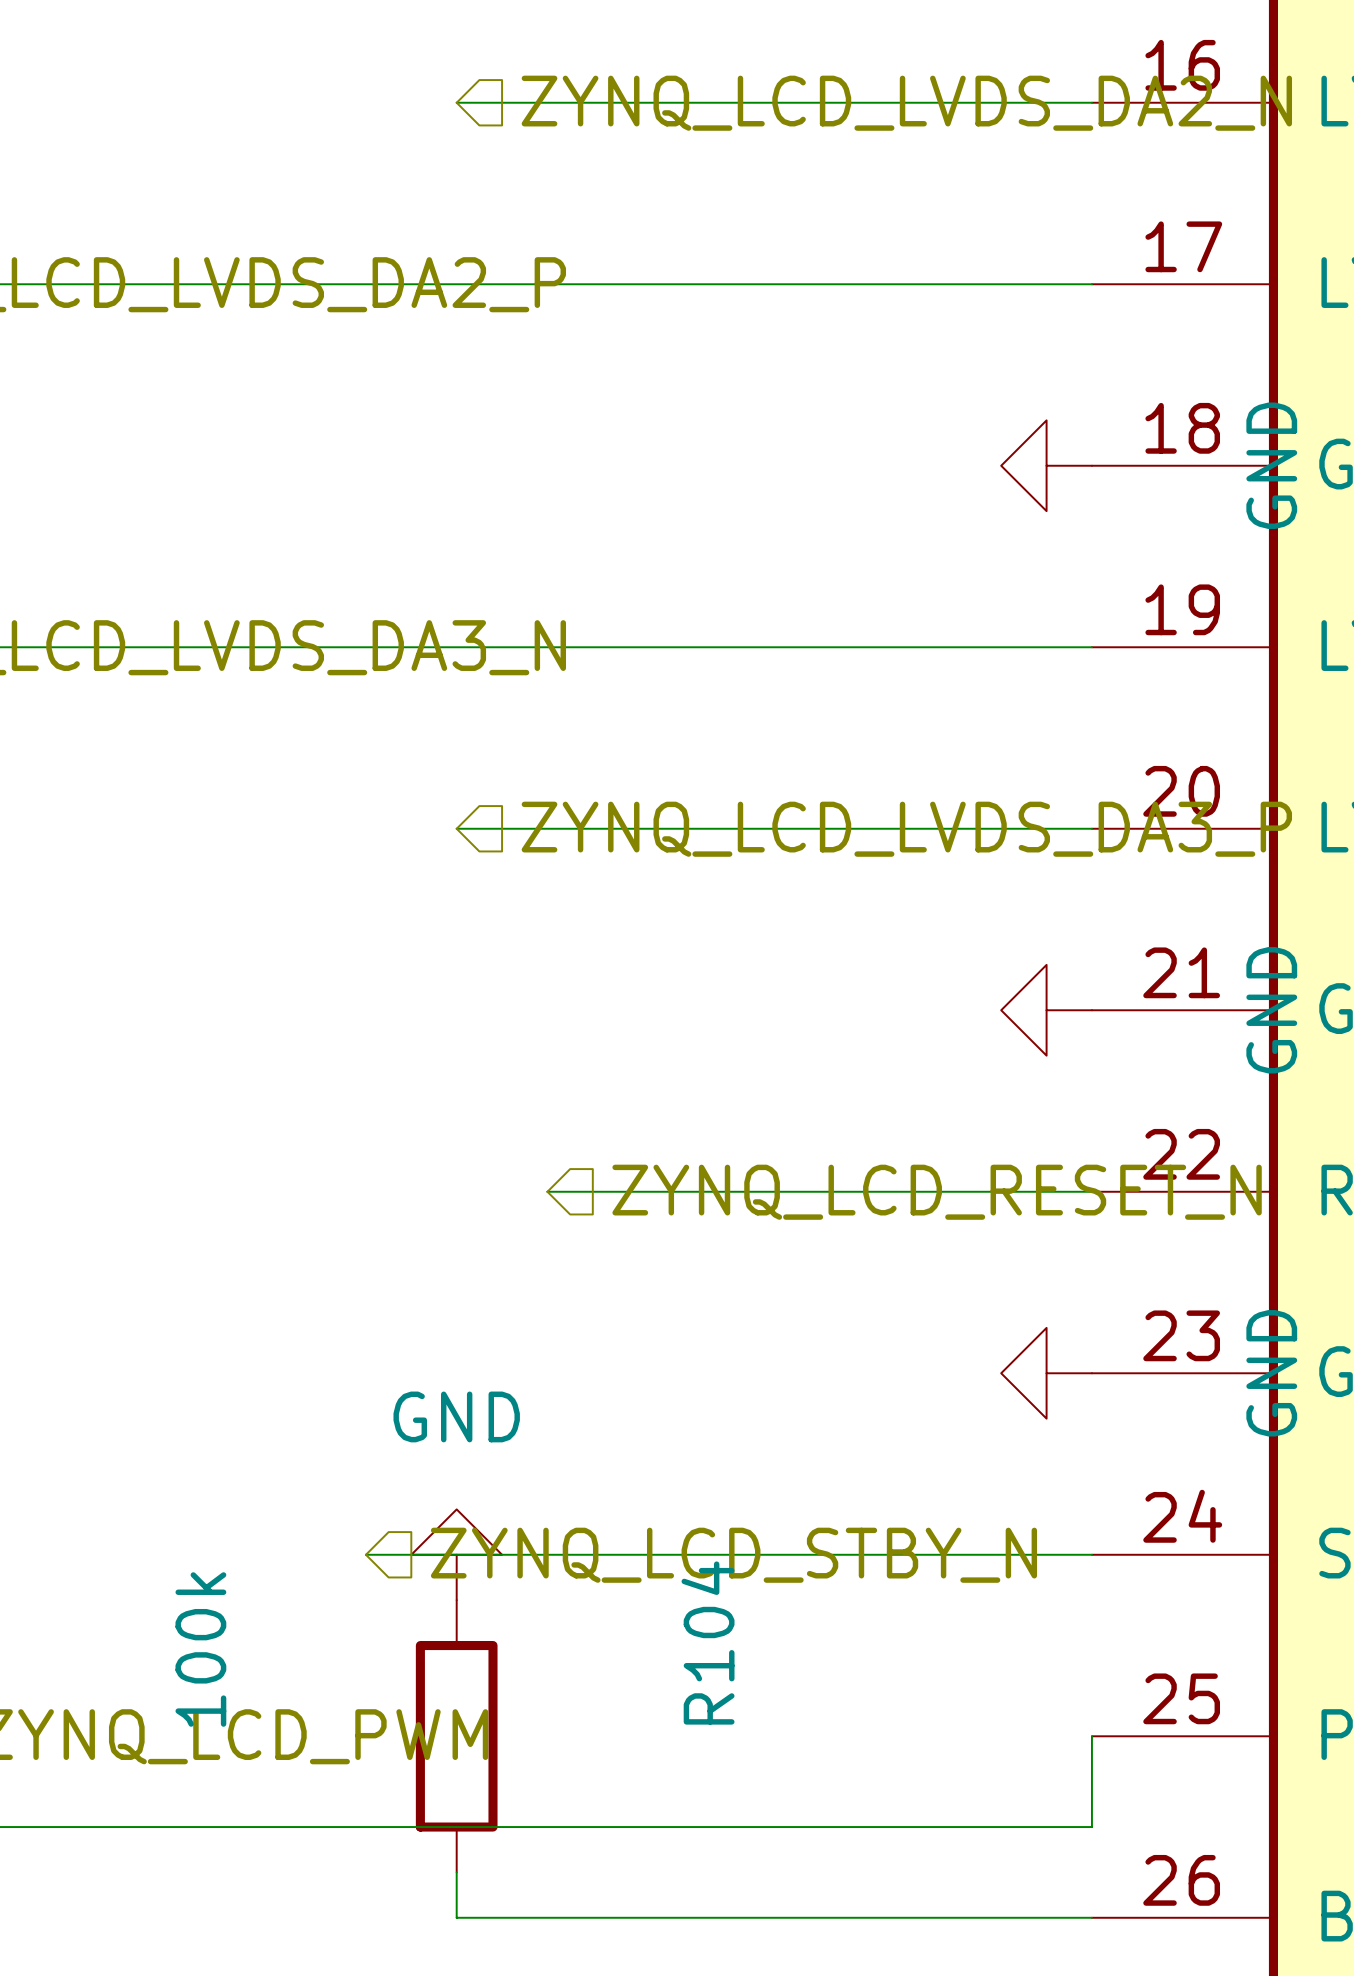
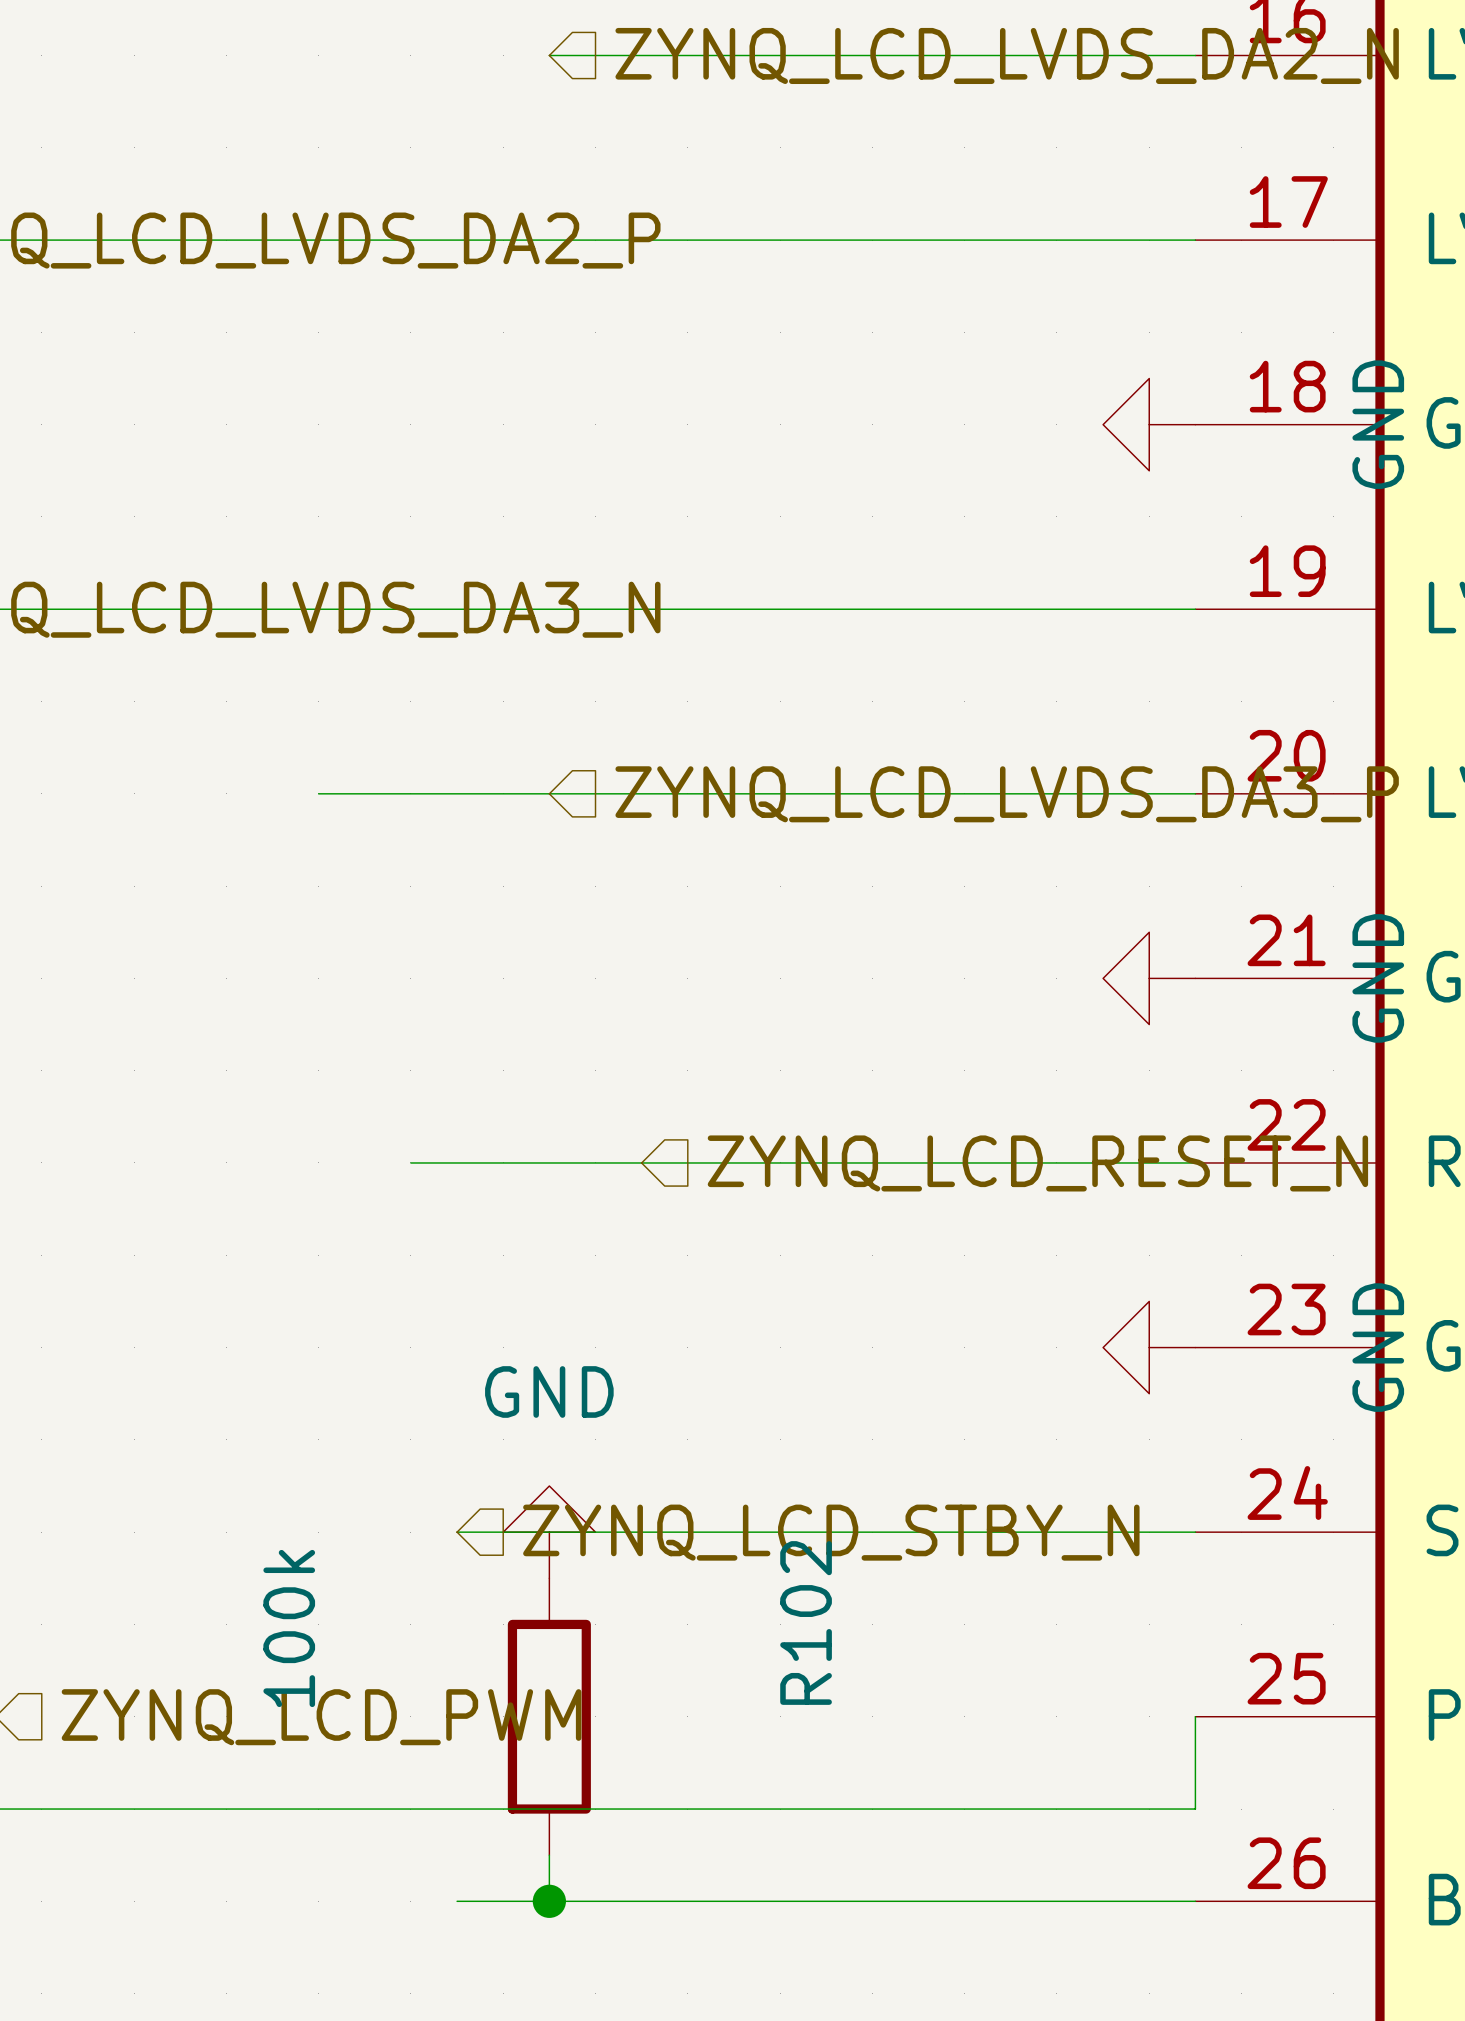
wire: none -> (318, 793) (549, 793)
wire: none -> (410, 1162) (641, 1162)
R104 name: R104 (708, 1643) -> R102 (806, 1622)
wire: none -> (457, 1901) (549, 1901)
junction: none -> (549, 1901)

